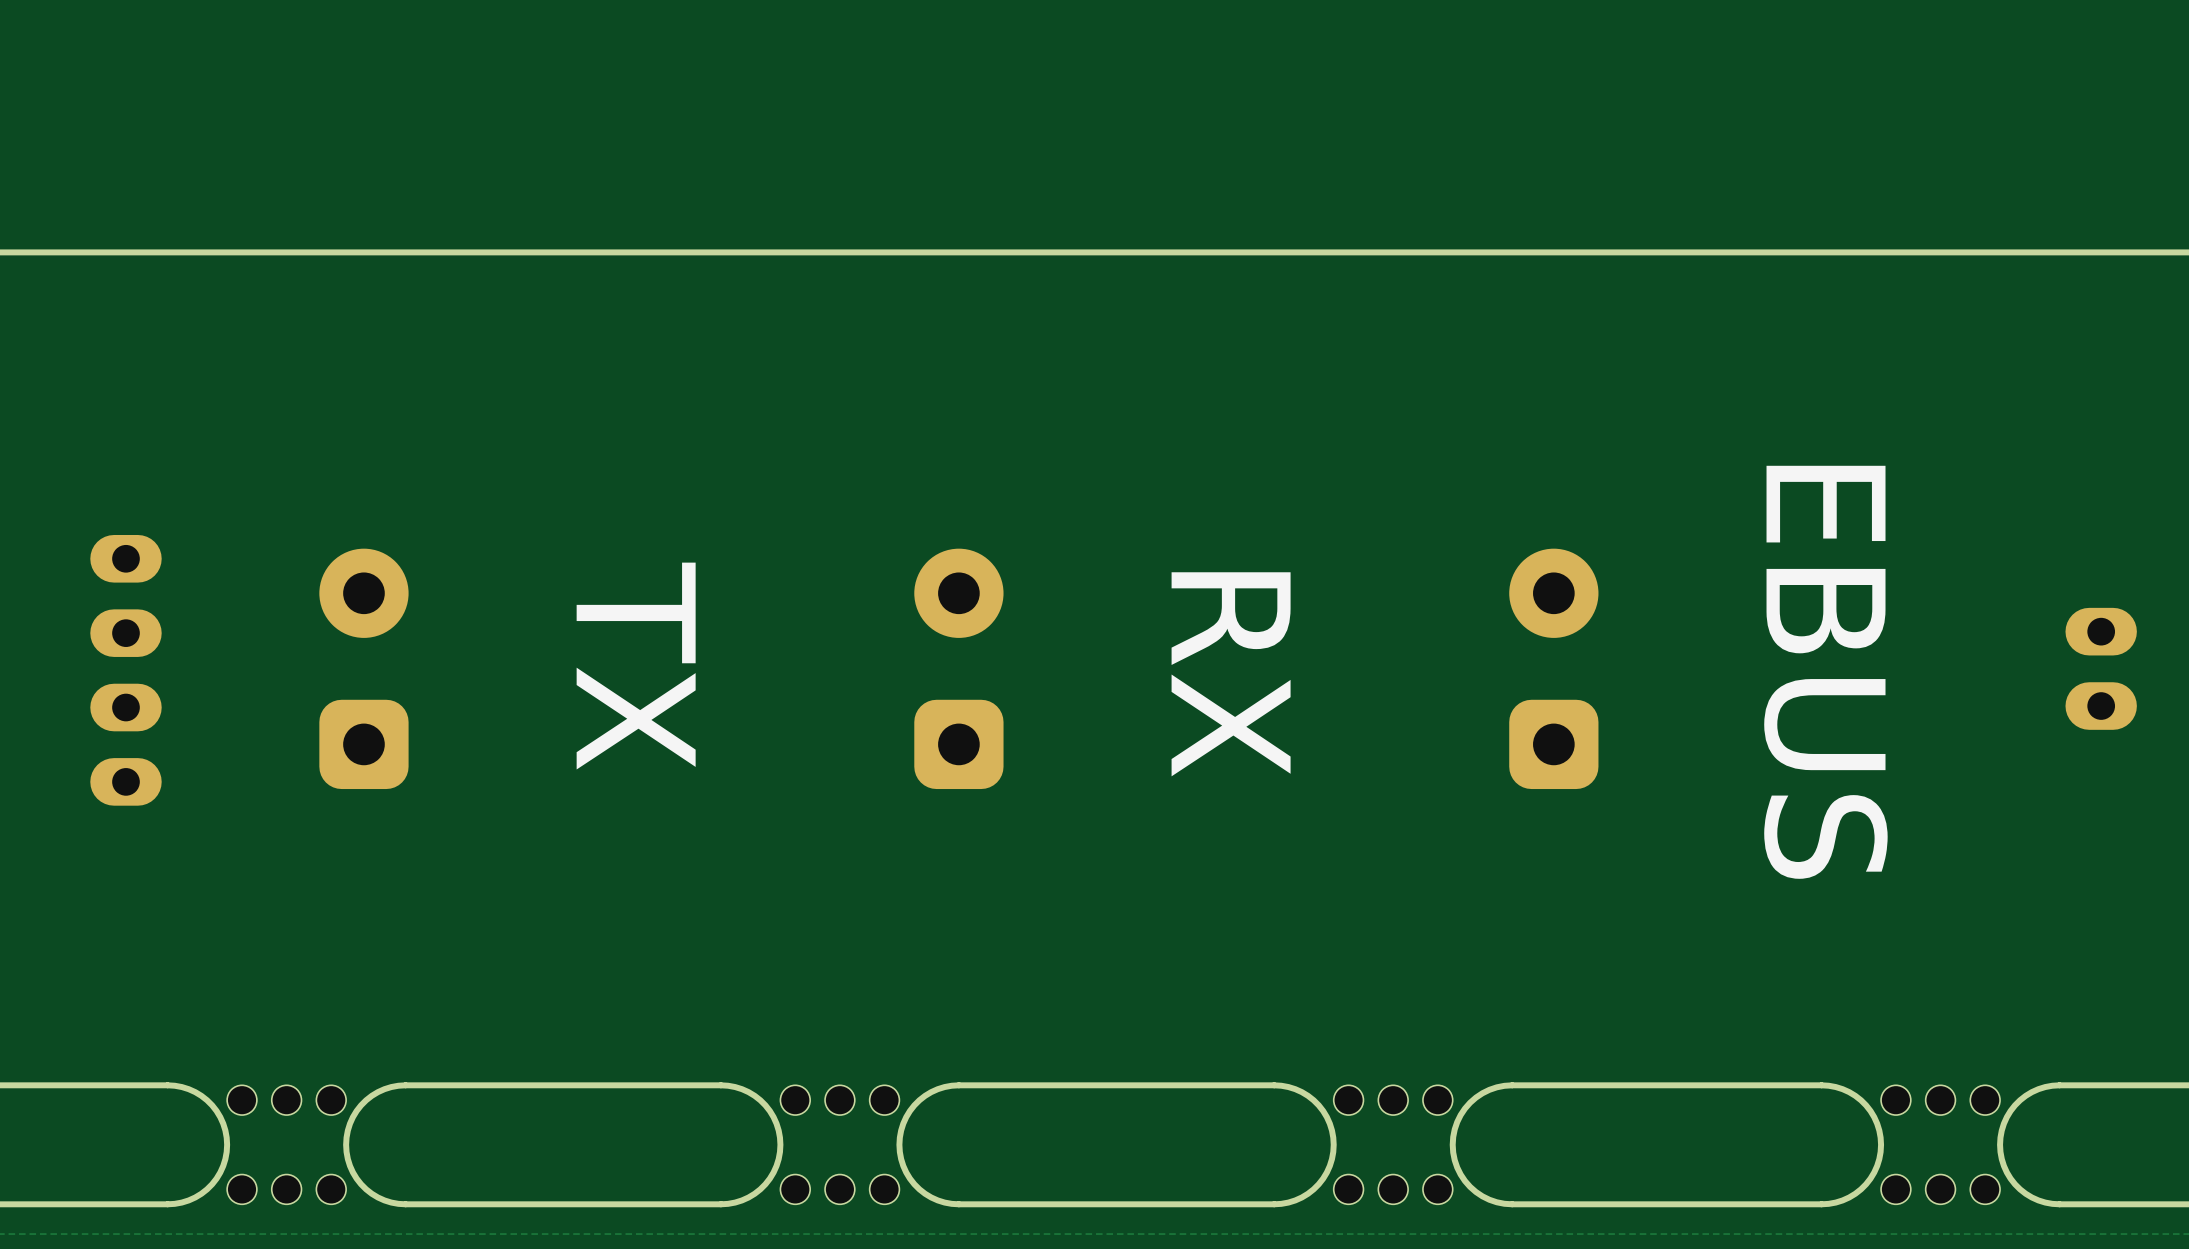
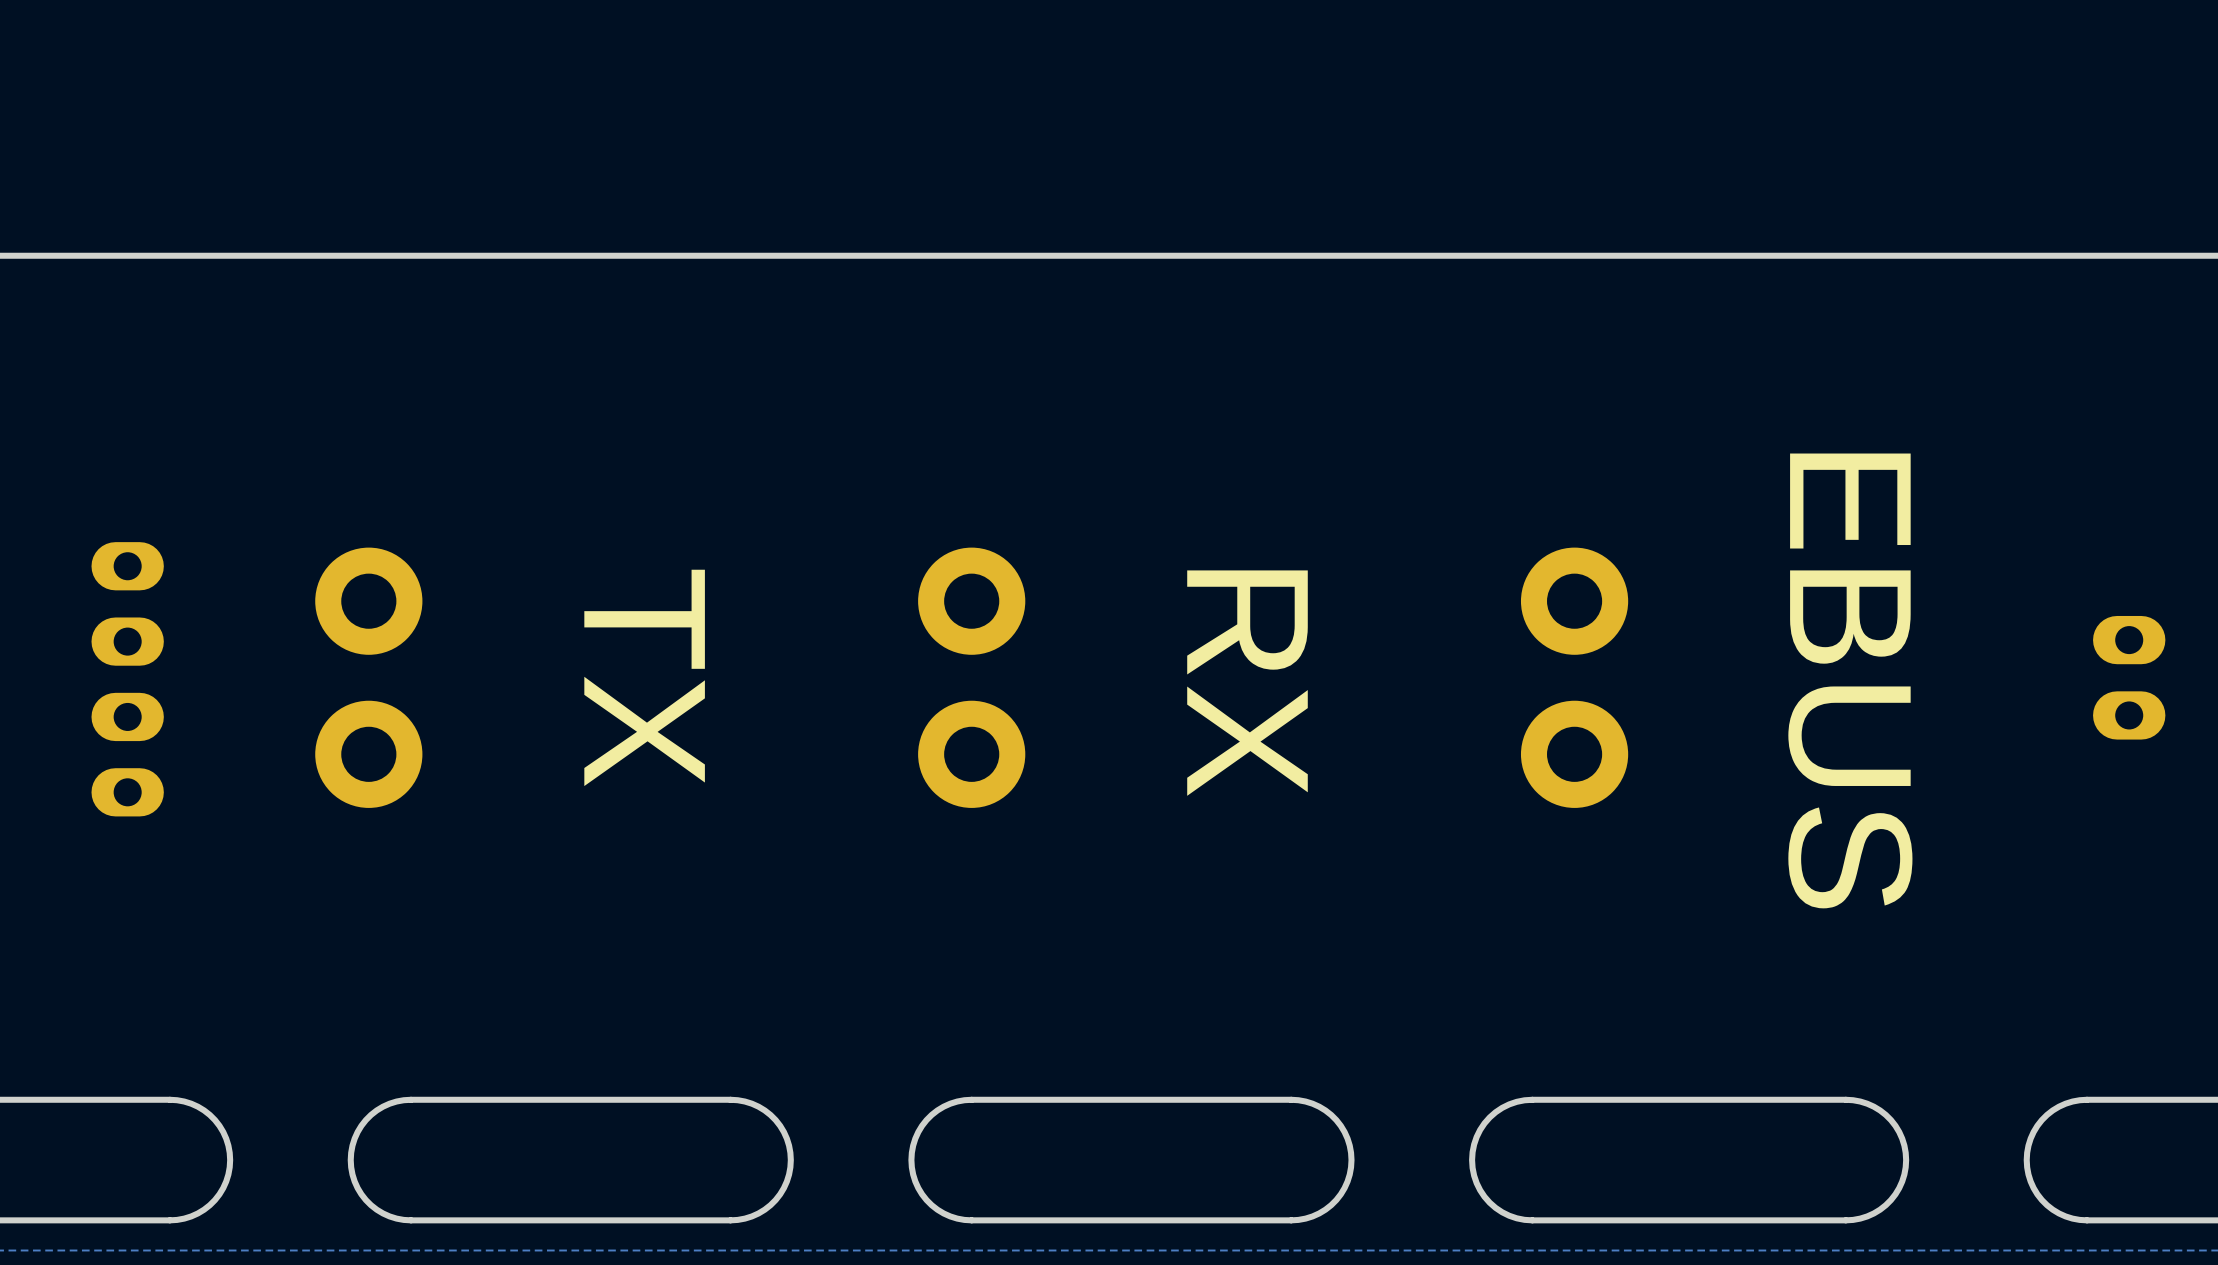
part footprint: [319, 548, 409, 790] -> [315, 547, 423, 808]
part footprint: [914, 548, 1004, 790] -> [918, 547, 1026, 808]
part footprint: [1509, 548, 1599, 790] -> [1520, 547, 1629, 808]
part: (286, 1144) -> none
part: (839, 1144) -> none
part: (1393, 1144) -> none
part: (1940, 1144) -> none

